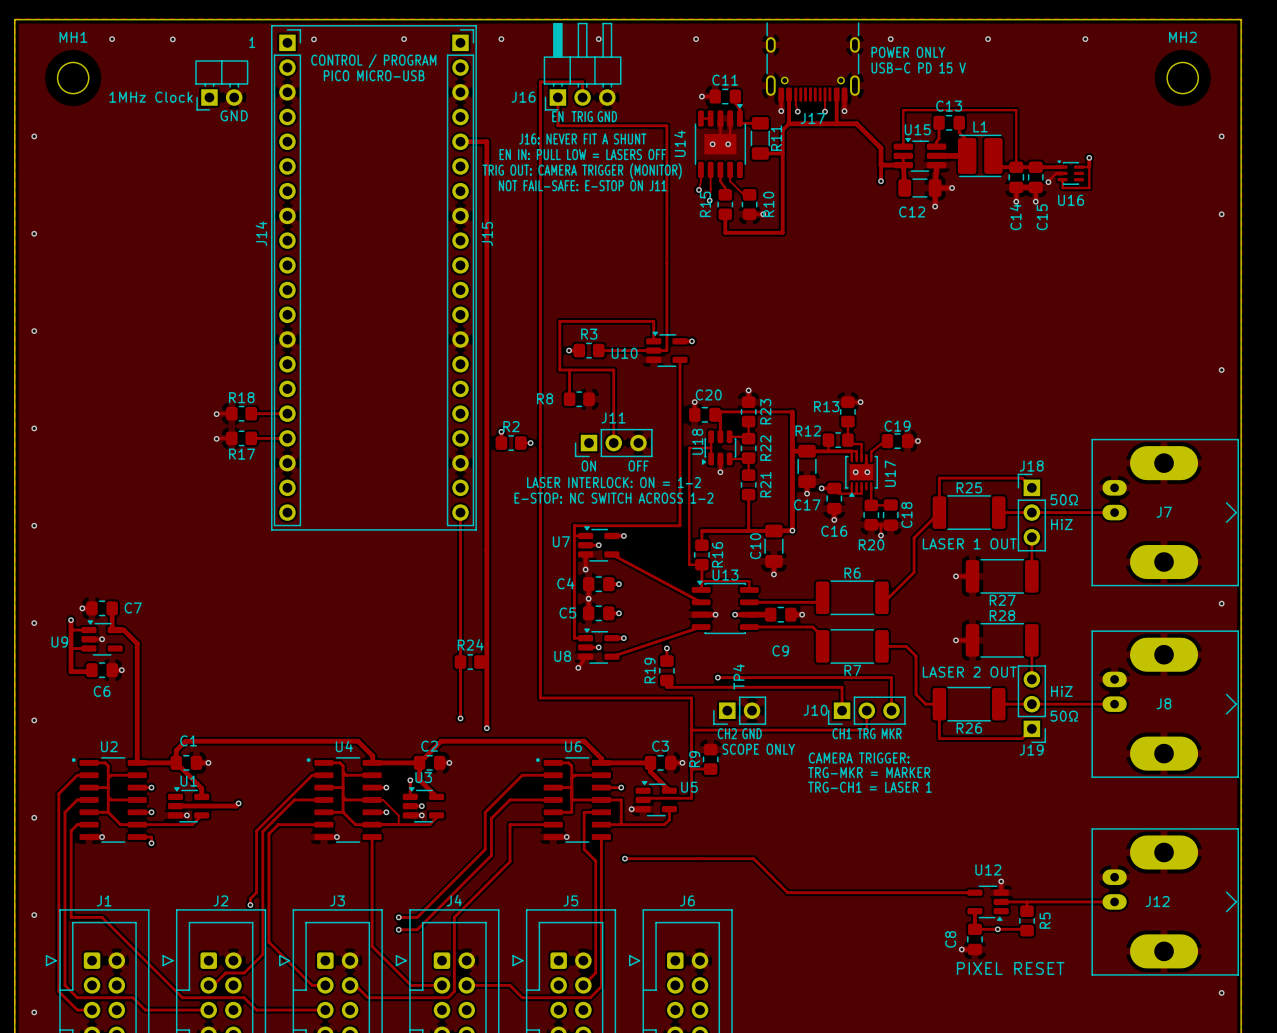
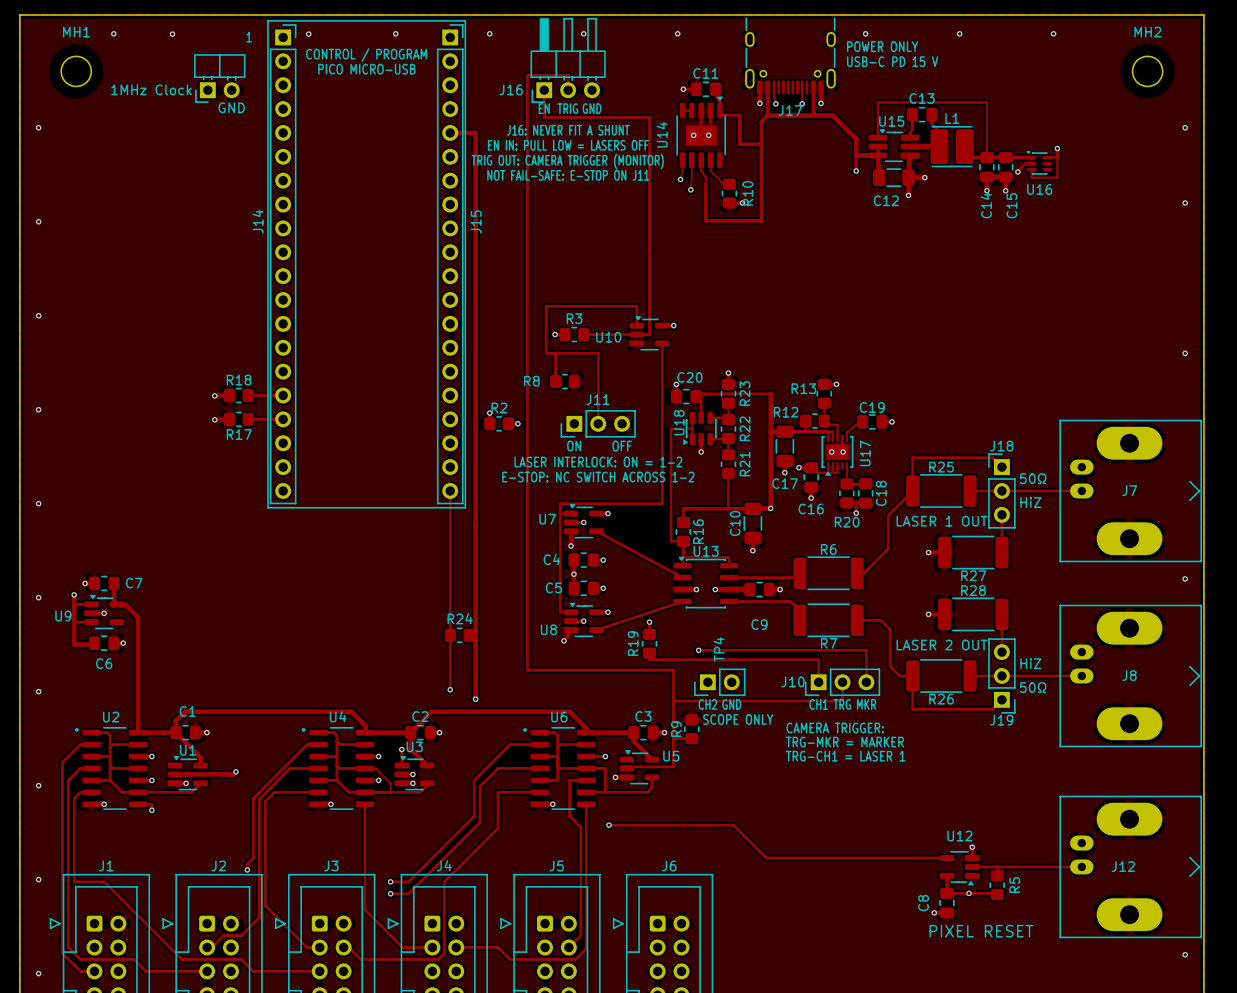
track: none -> (739, 115) (739, 144)
R11: (760, 138) -> none
track: none -> (705, 184) (705, 202)
R15: (725, 204) -> none

